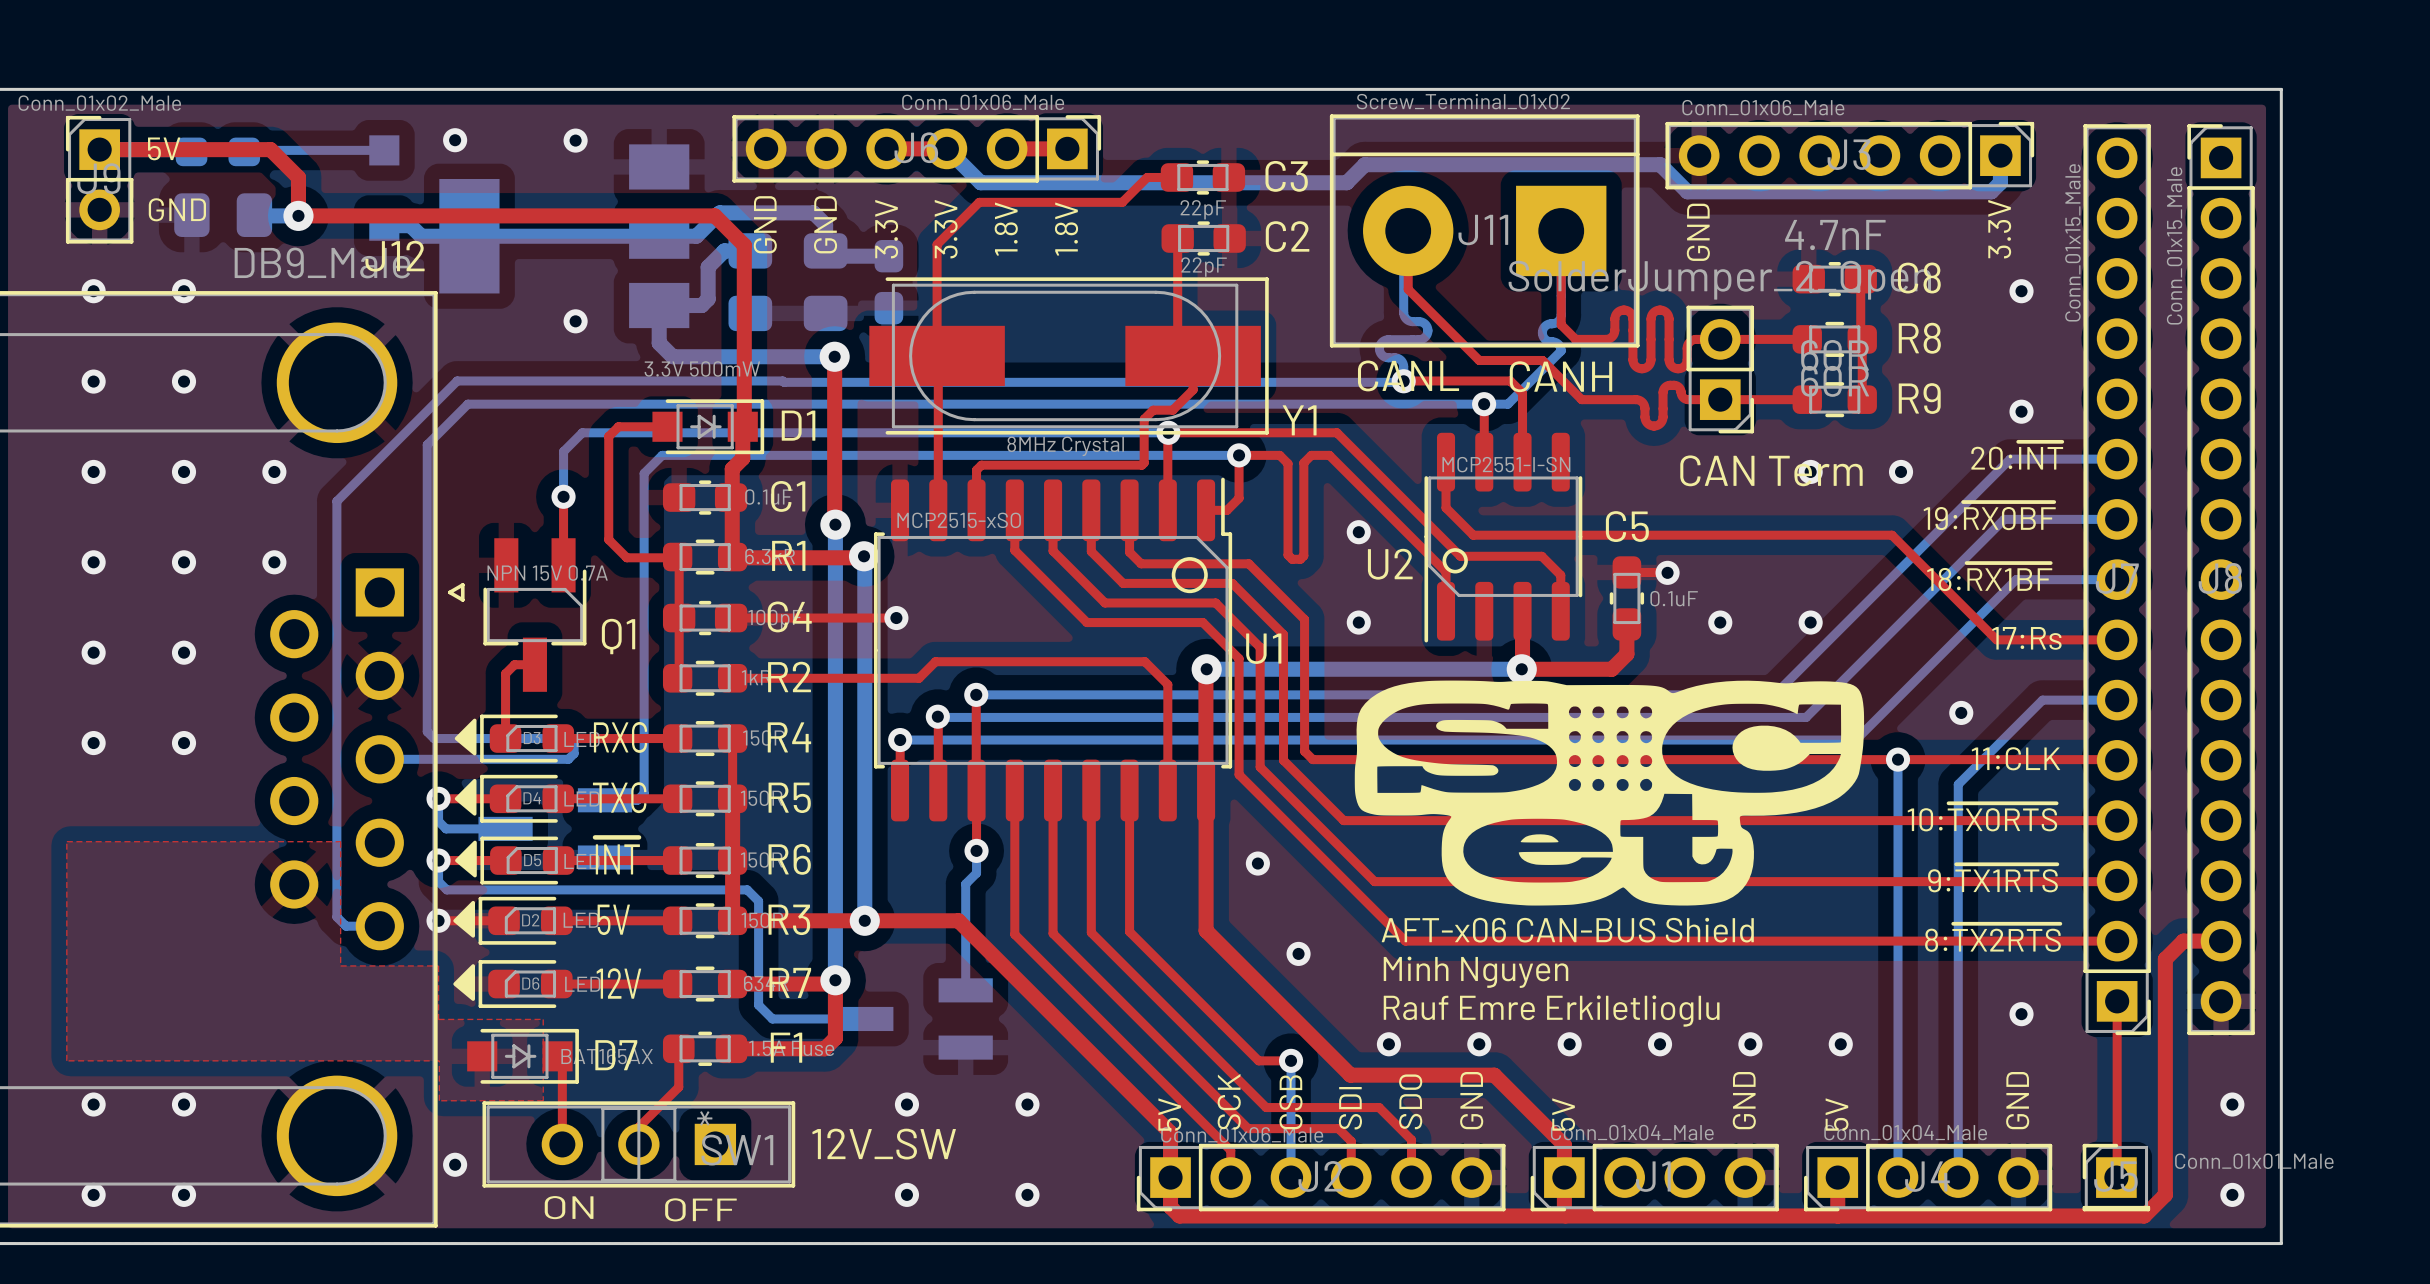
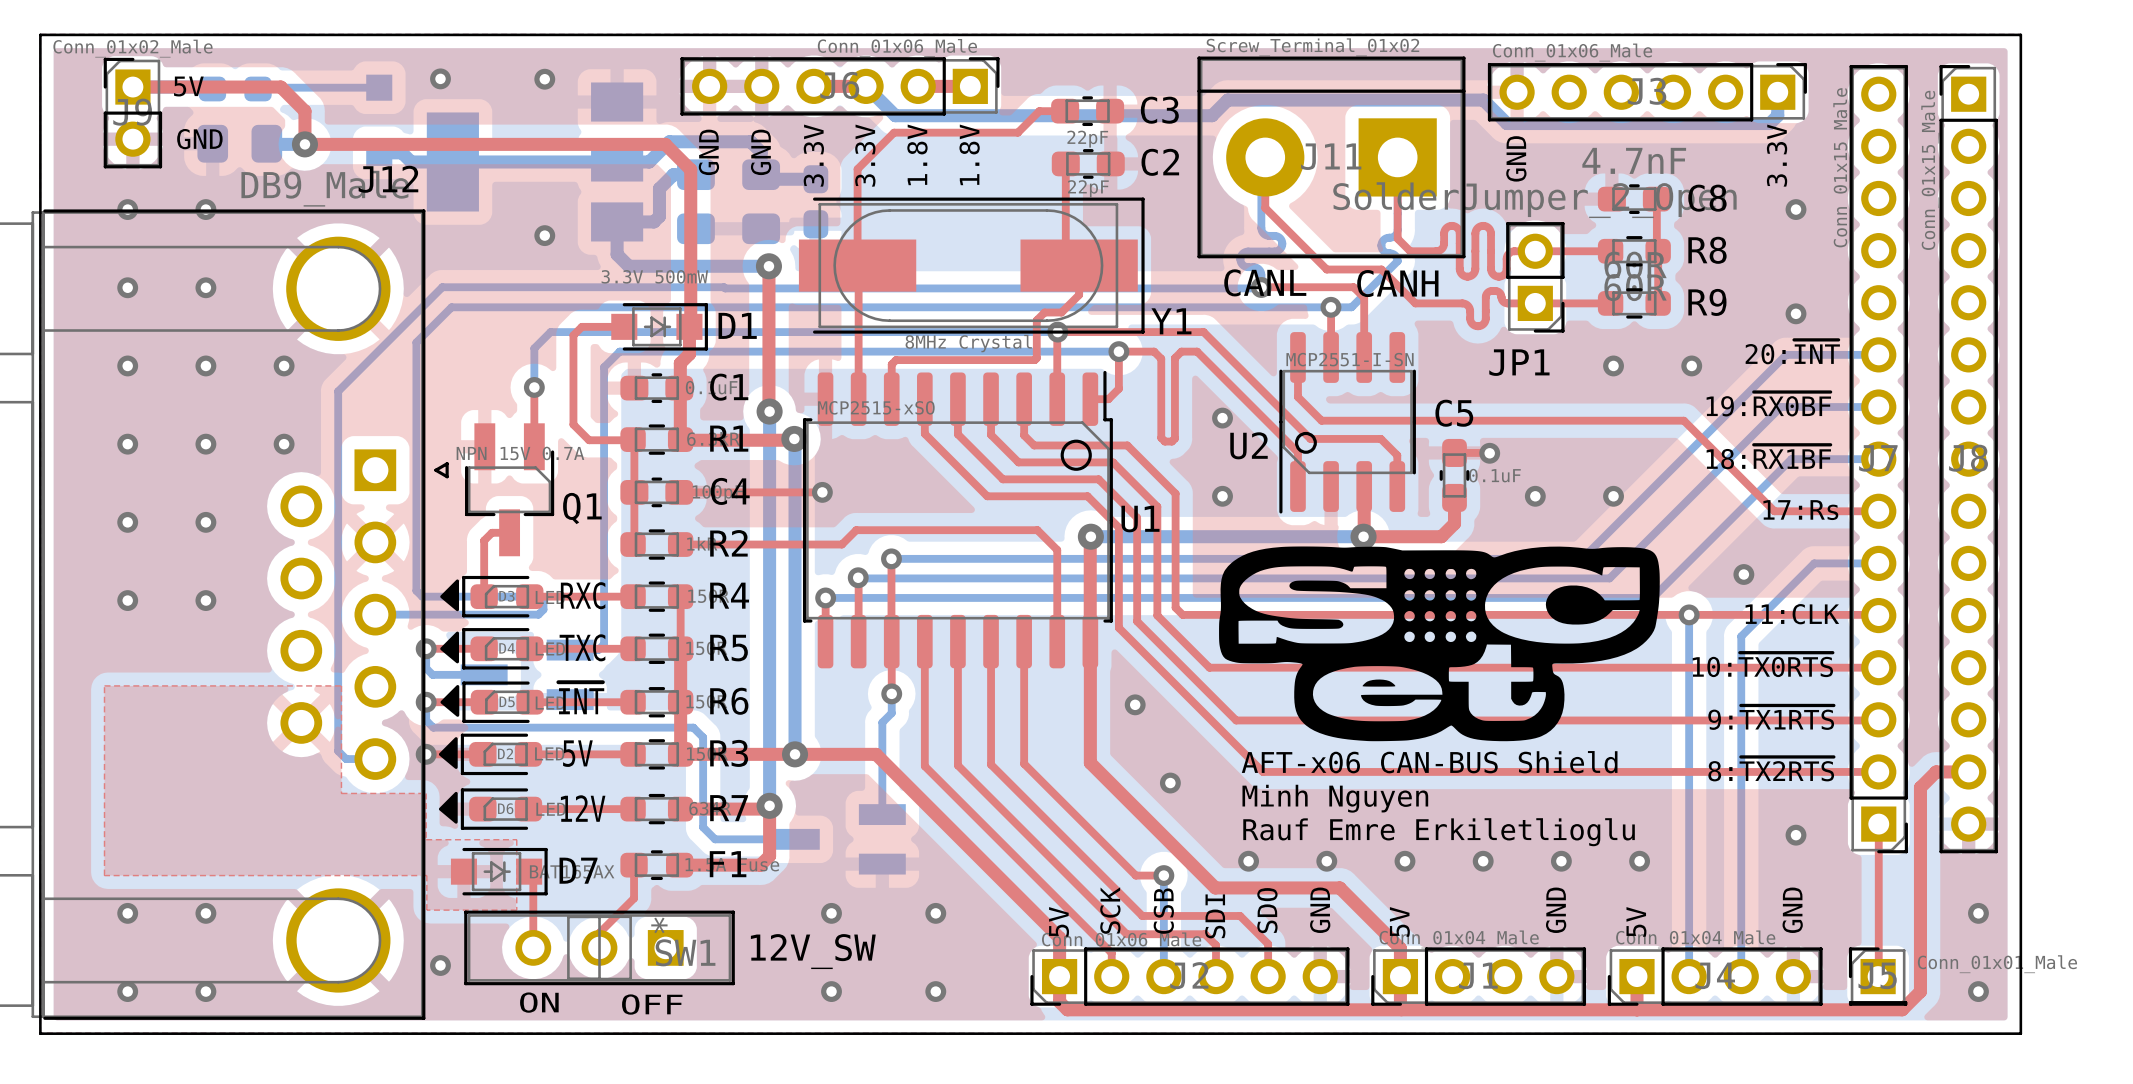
JP1 name: none -> JP1 (1519, 362)
JP1 text: CAN Term (1771, 470) -> none

